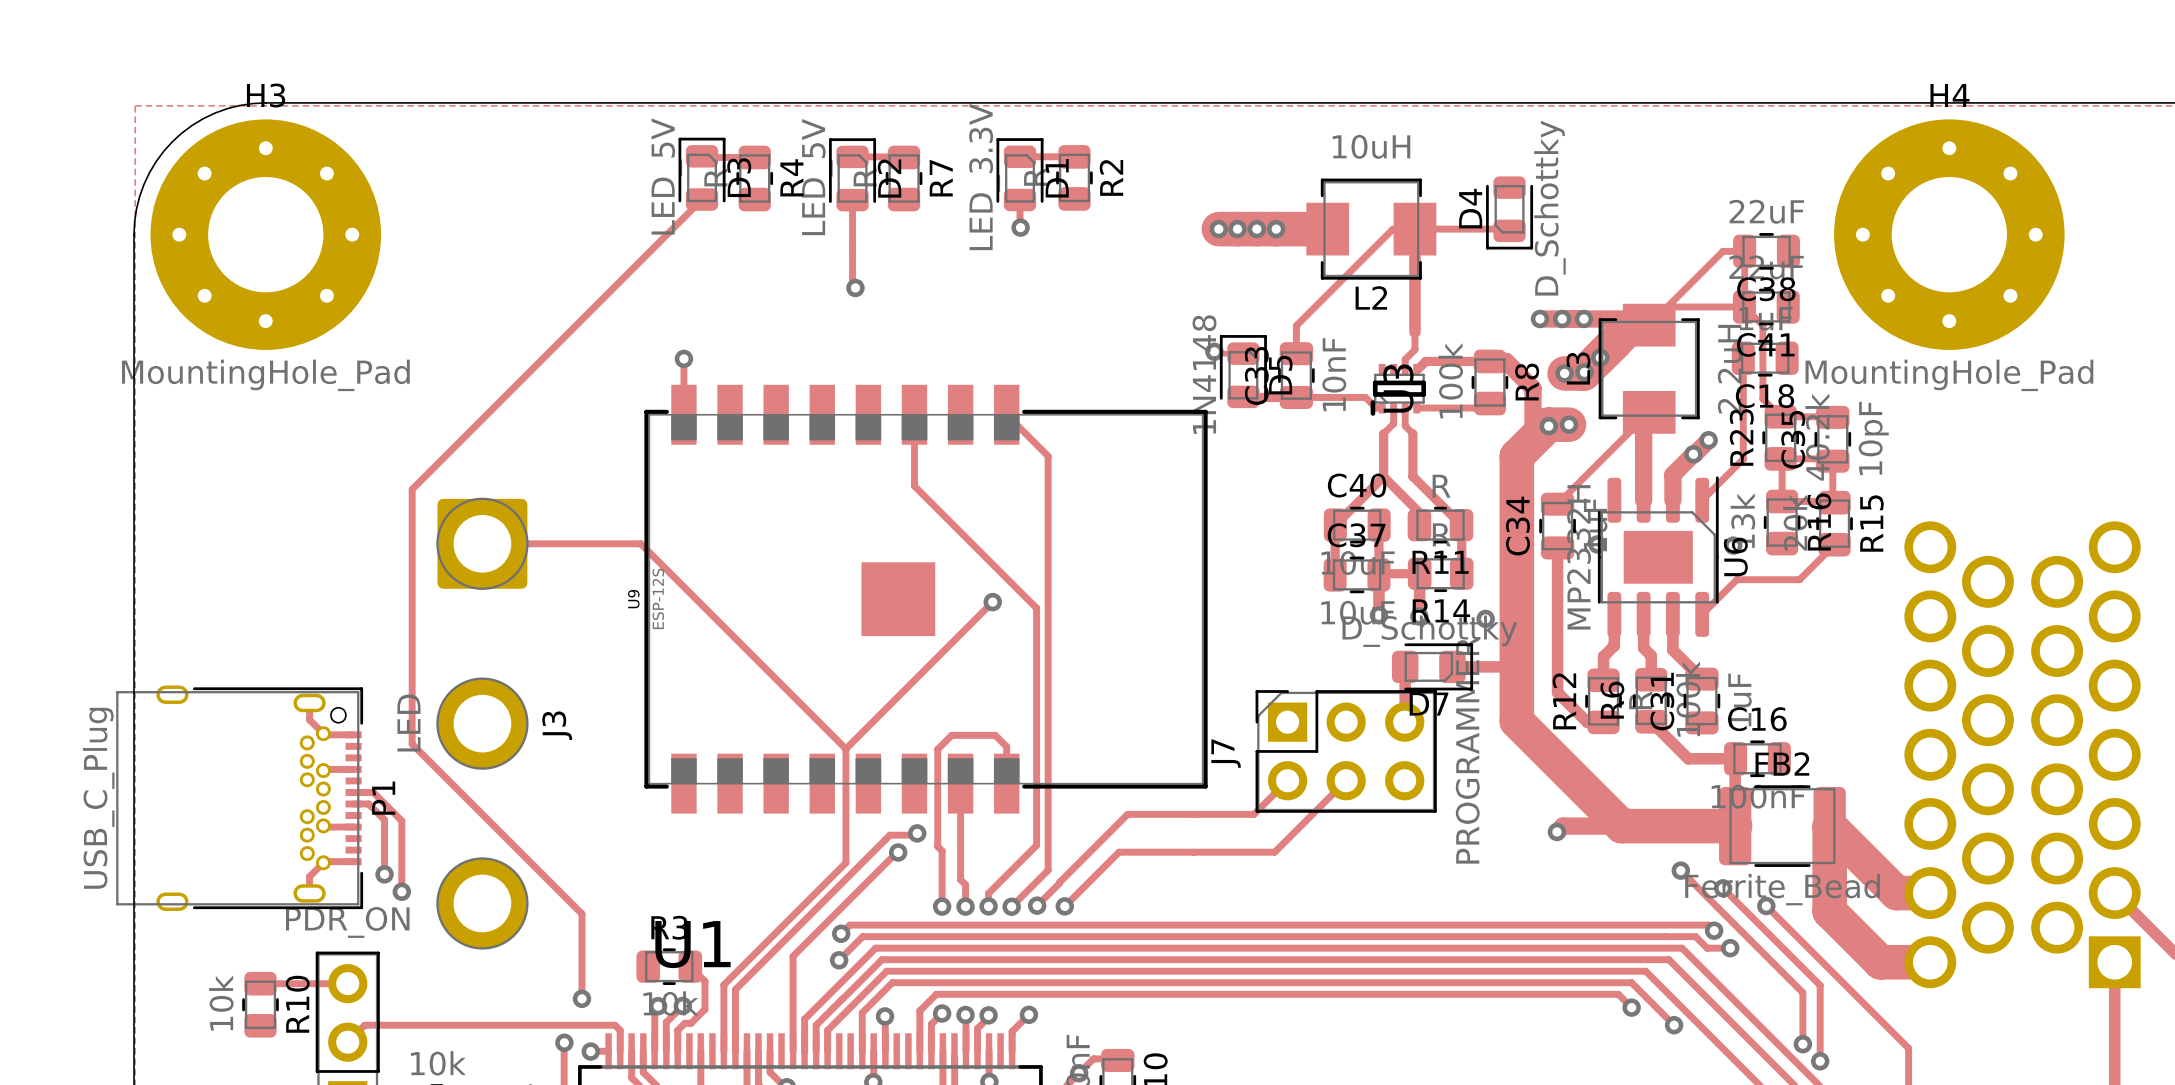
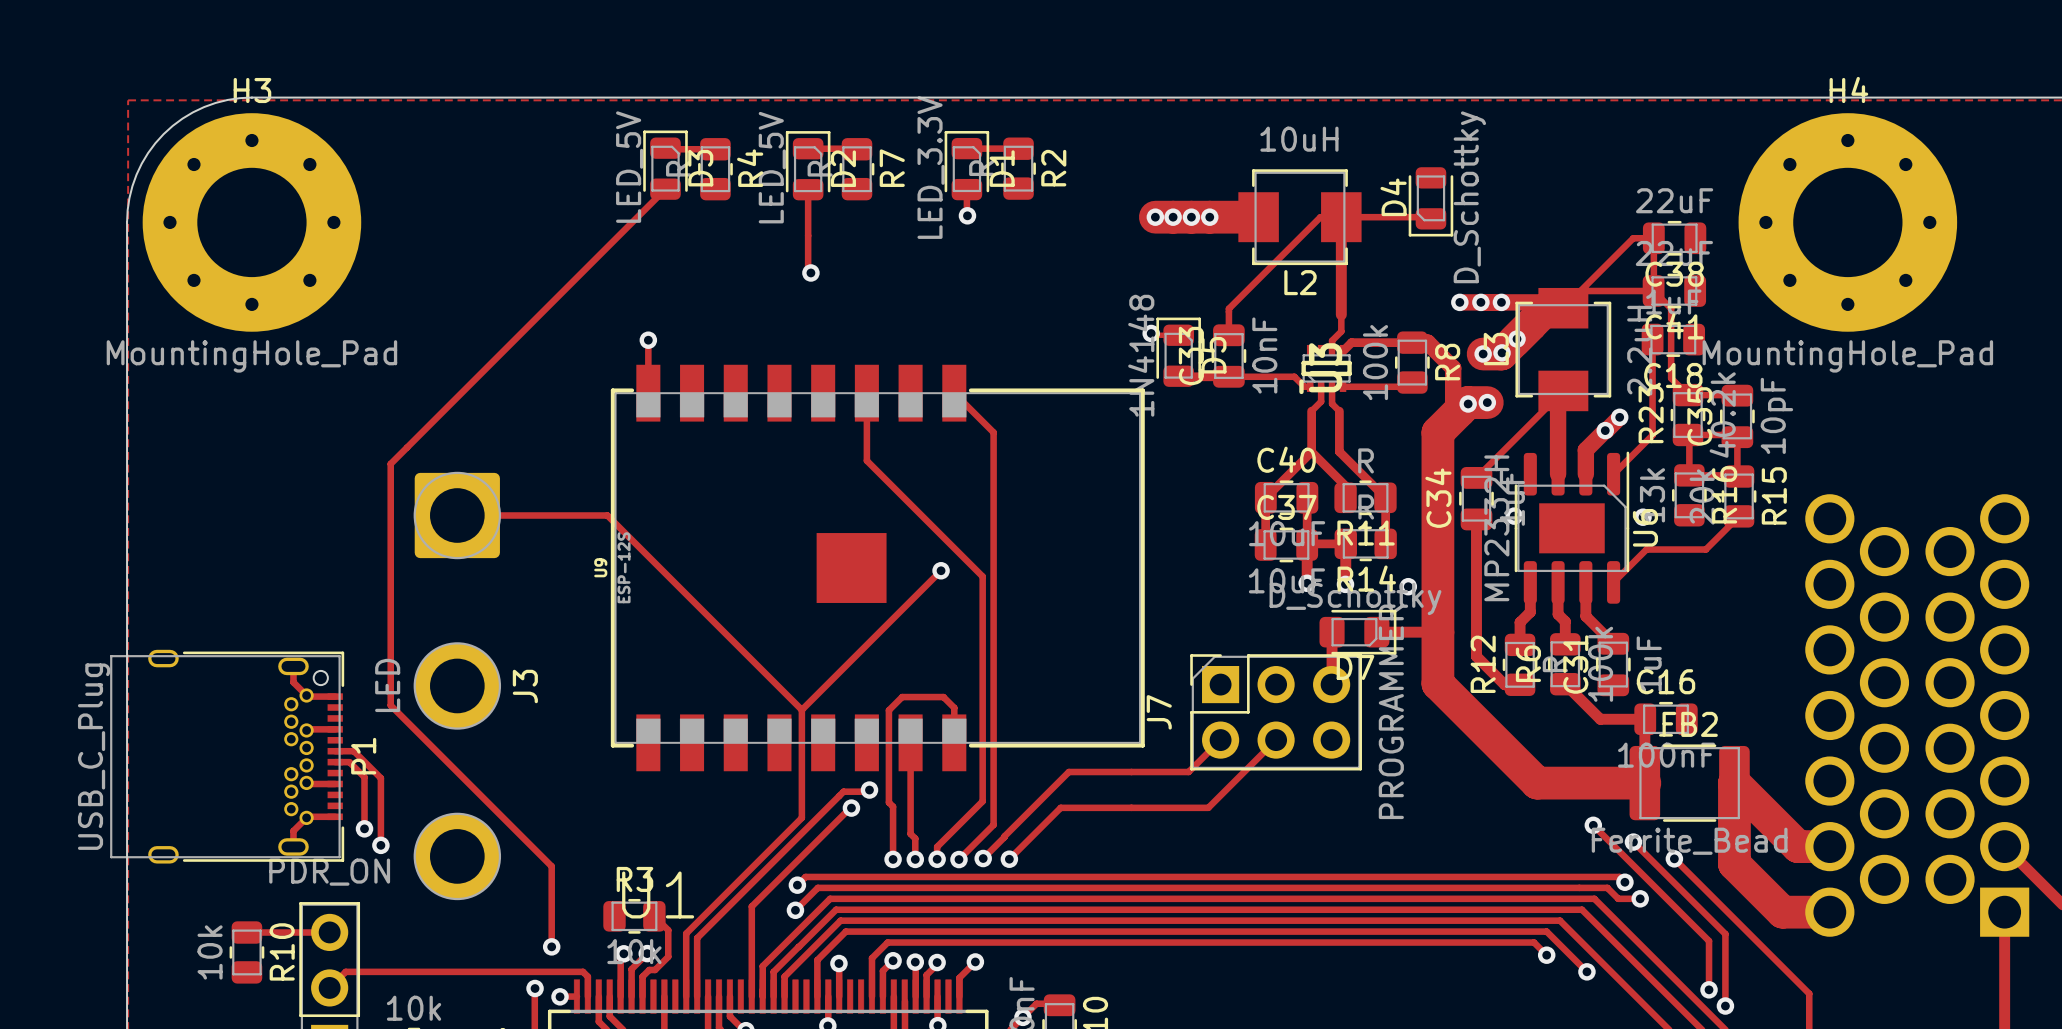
track: (1621, 826) (1562, 826) (1556, 831) -> none
via: (1556, 831) -> none

